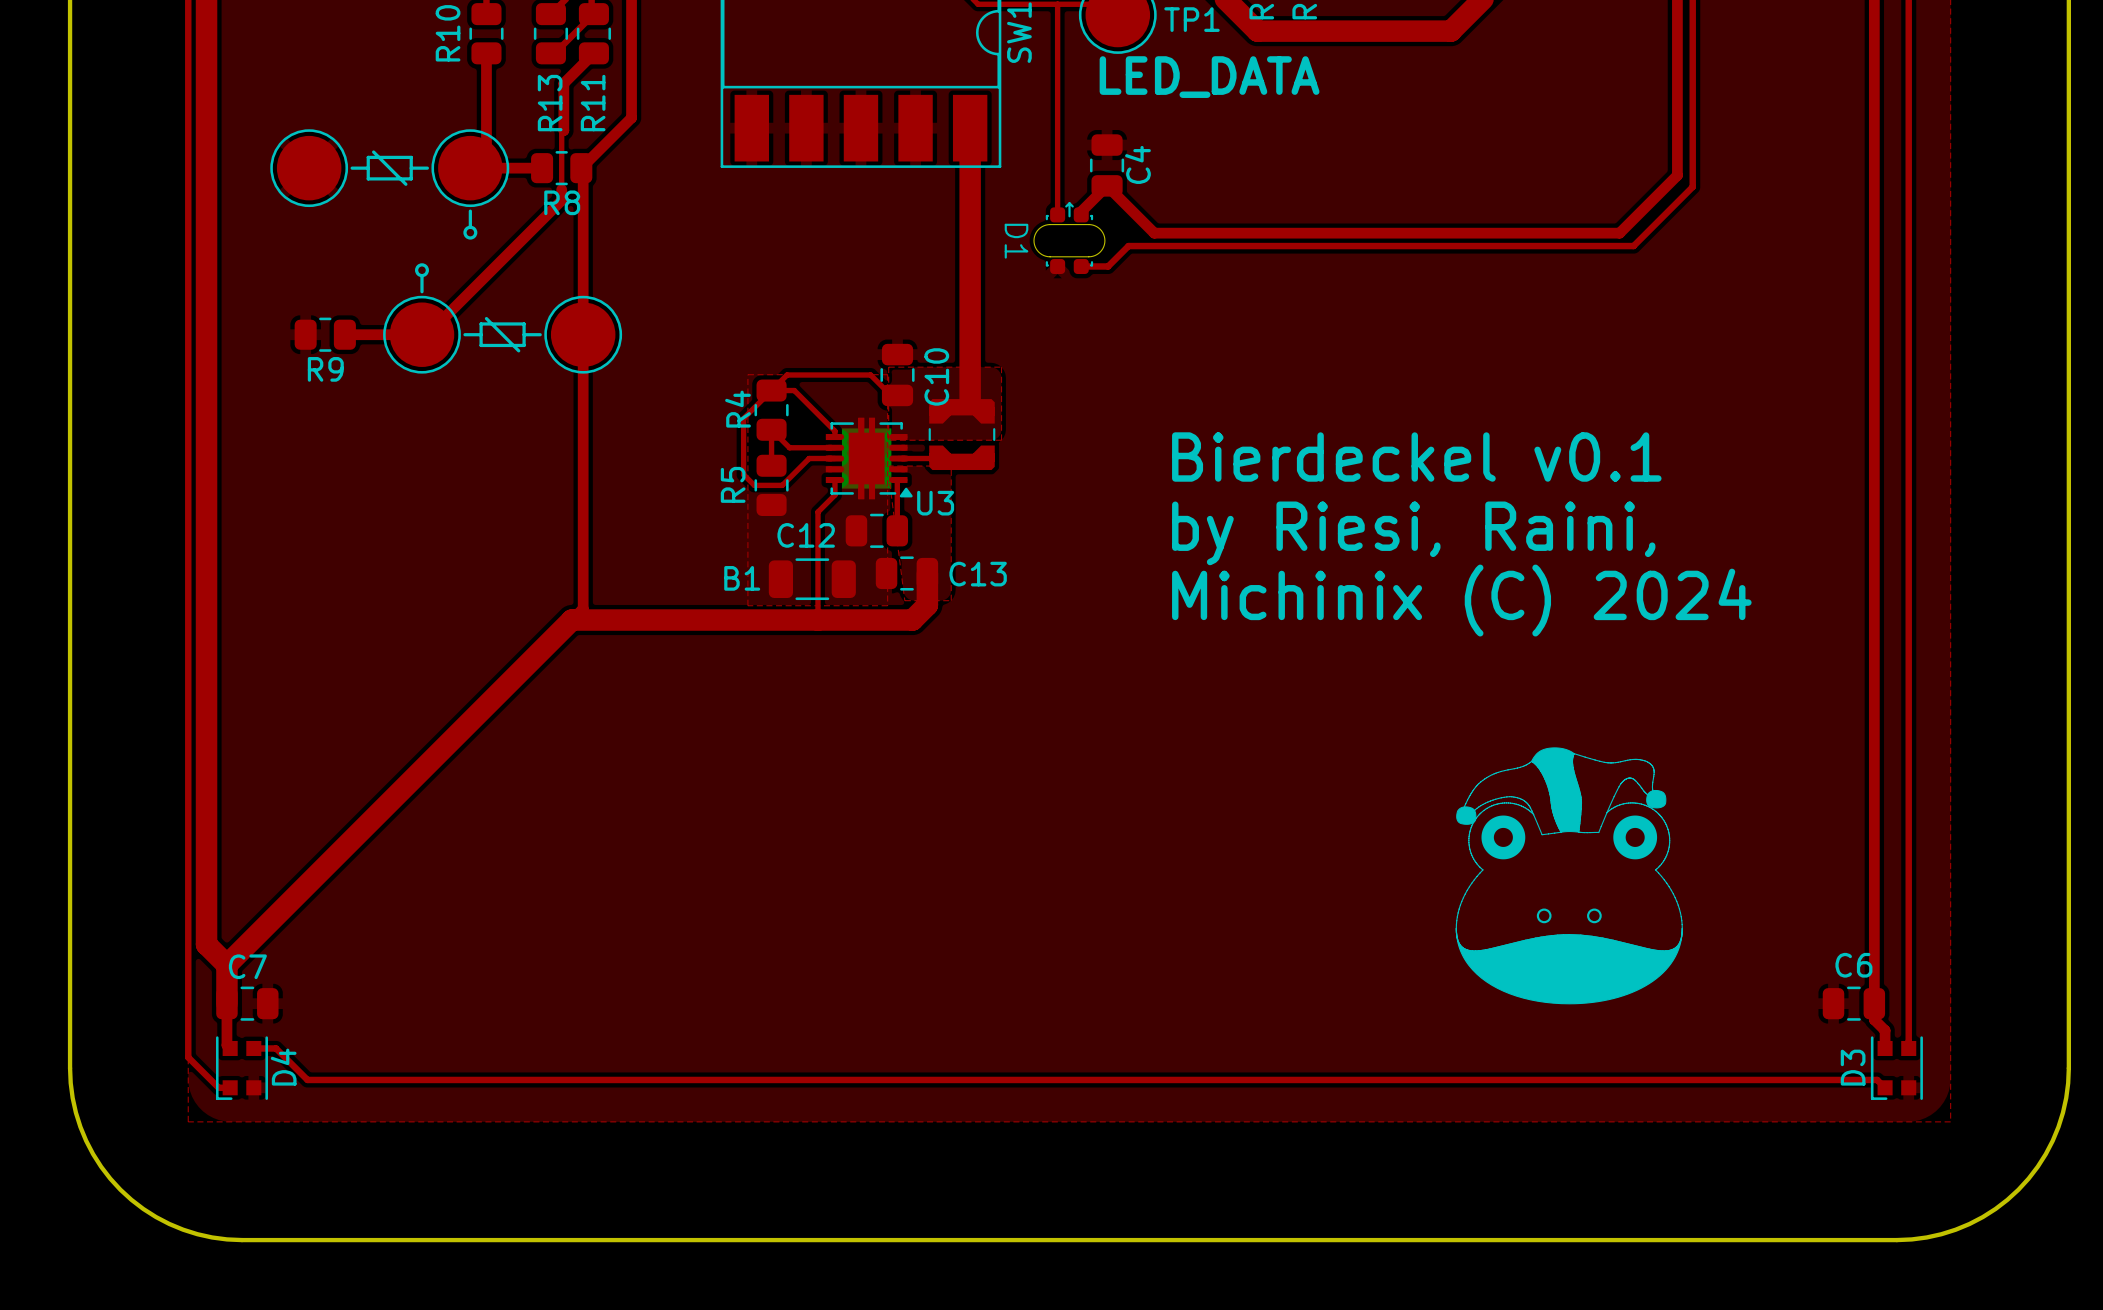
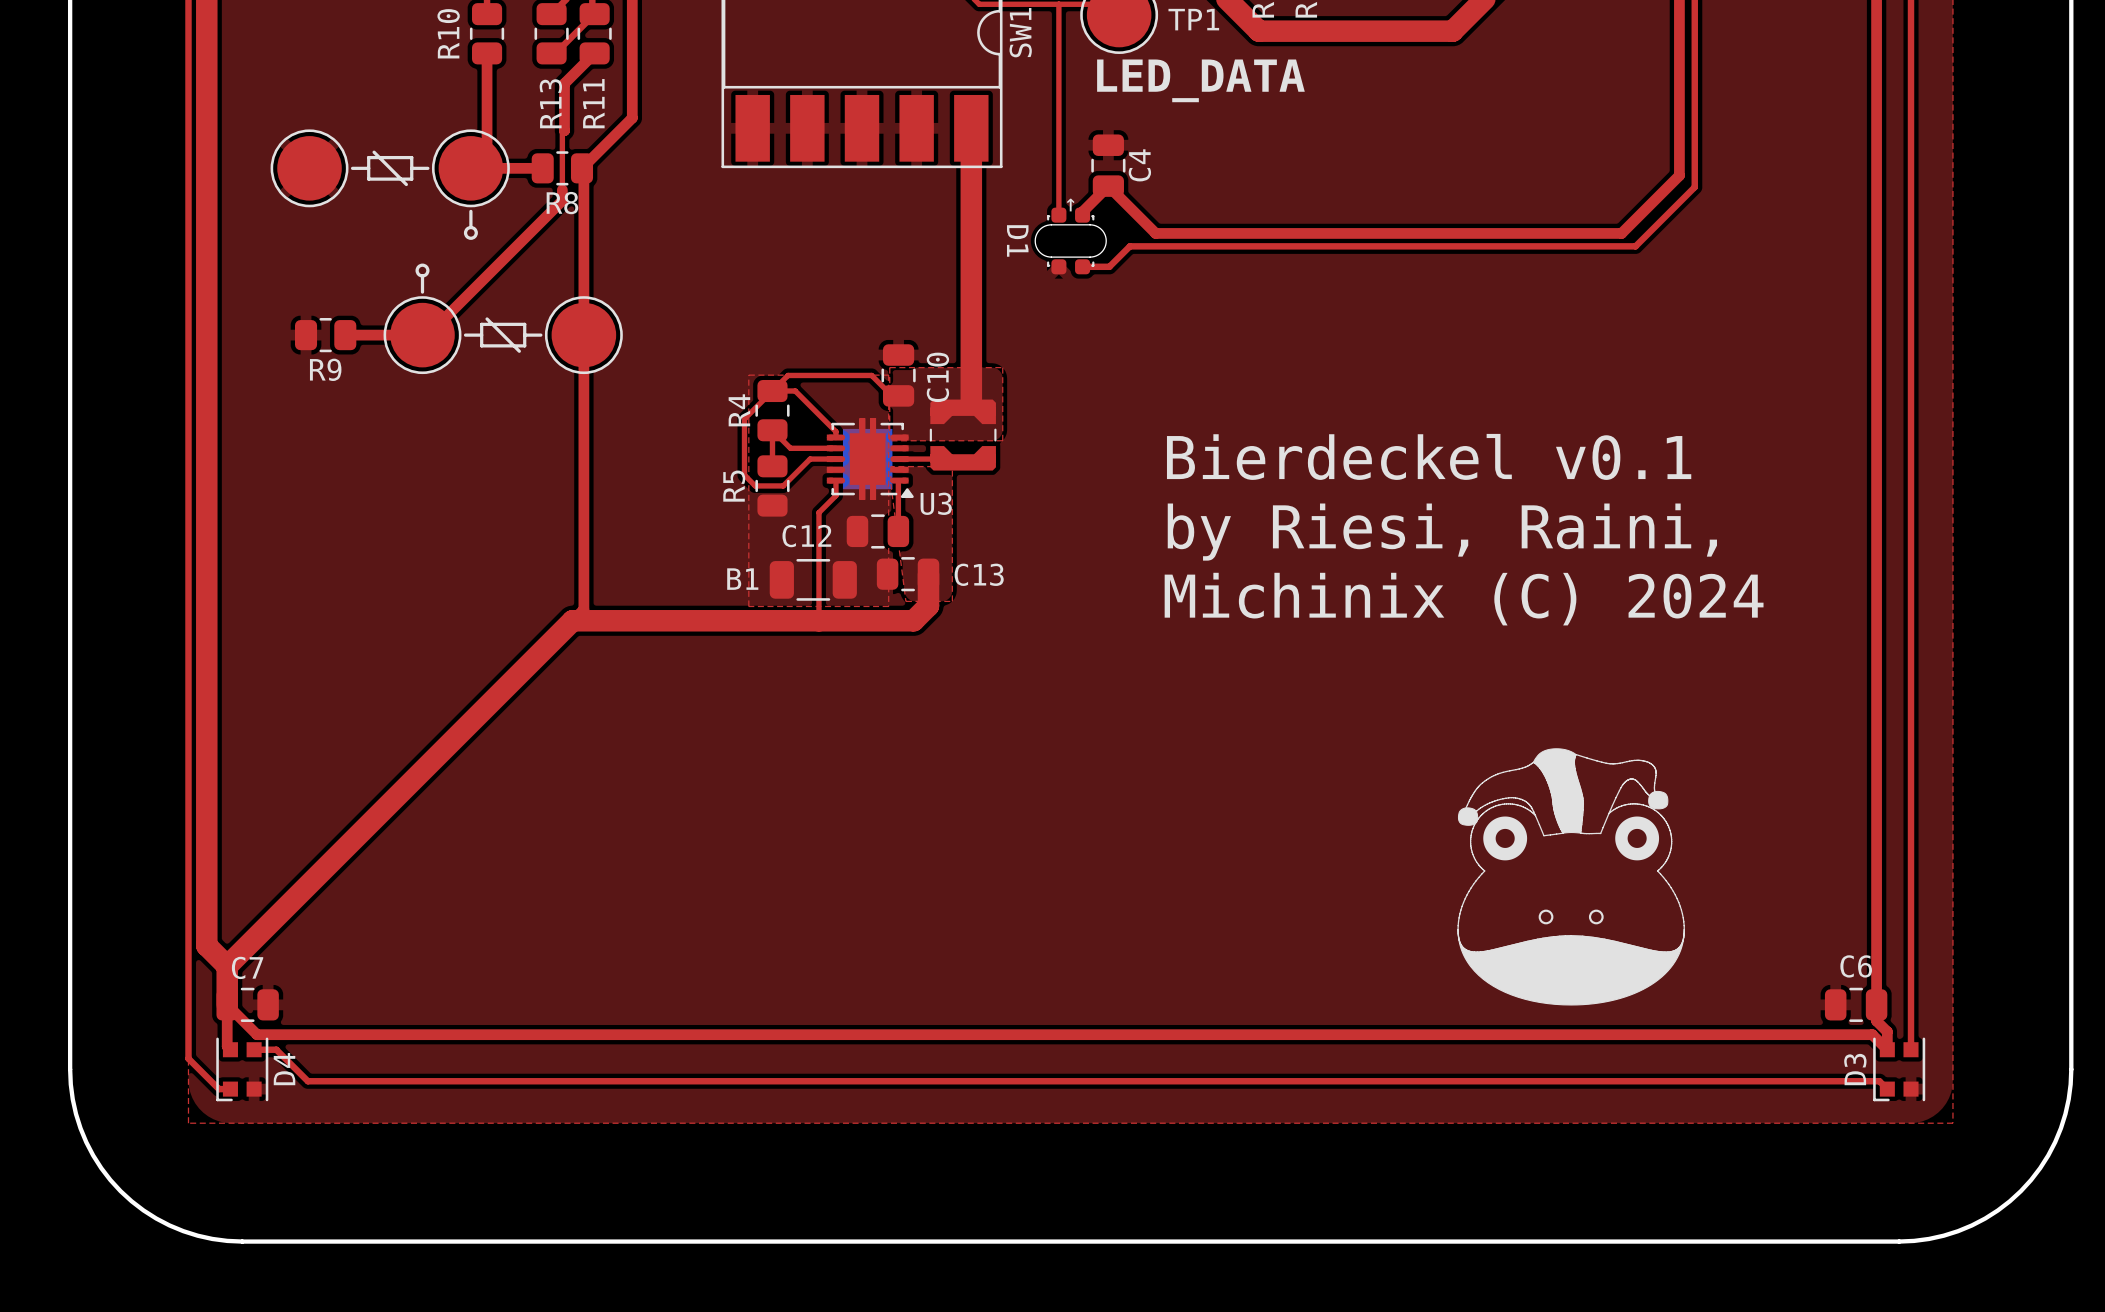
top track: none -> (227, 1004) (257, 1034) (1872, 1034) (1887, 1049)

